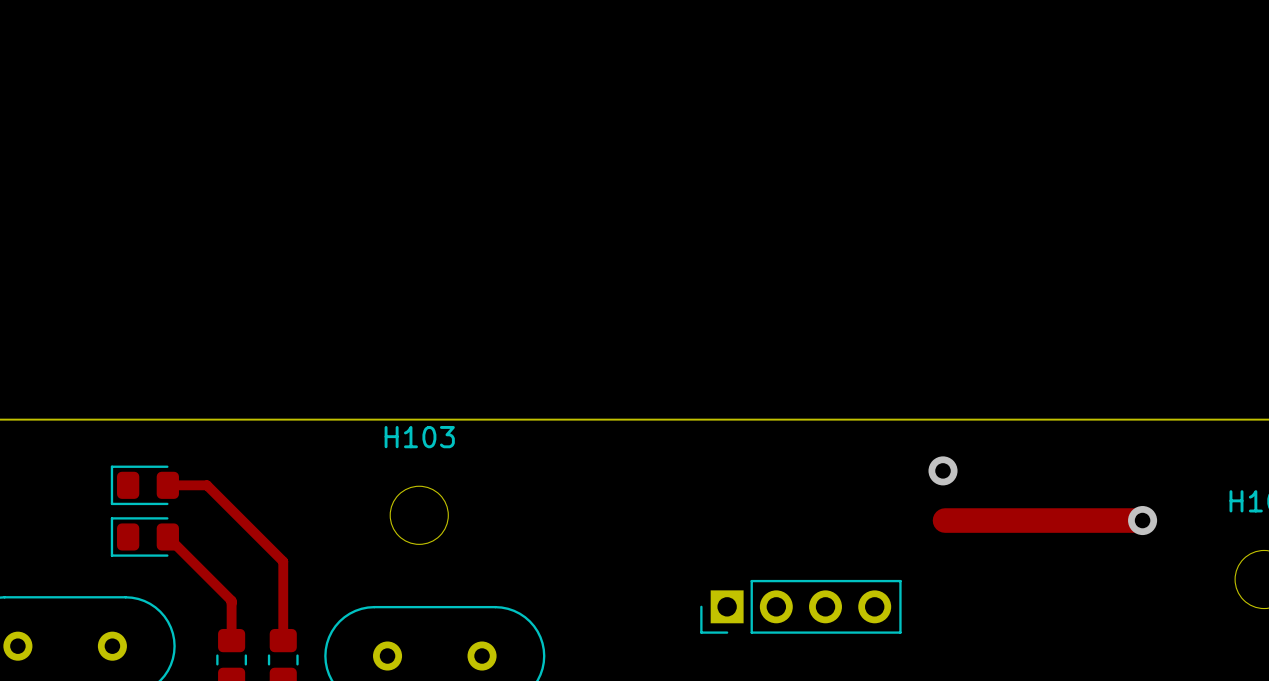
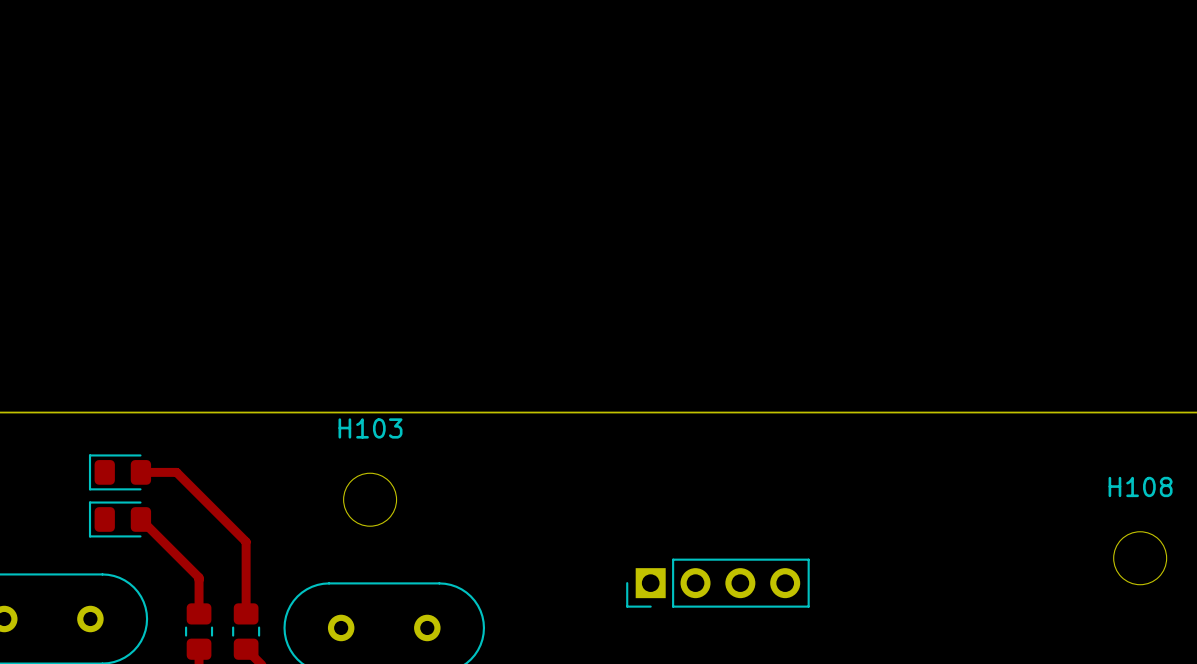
via: (943, 470) -> none
track: (945, 520) (1142, 520) -> none
via: (1142, 520) -> none

